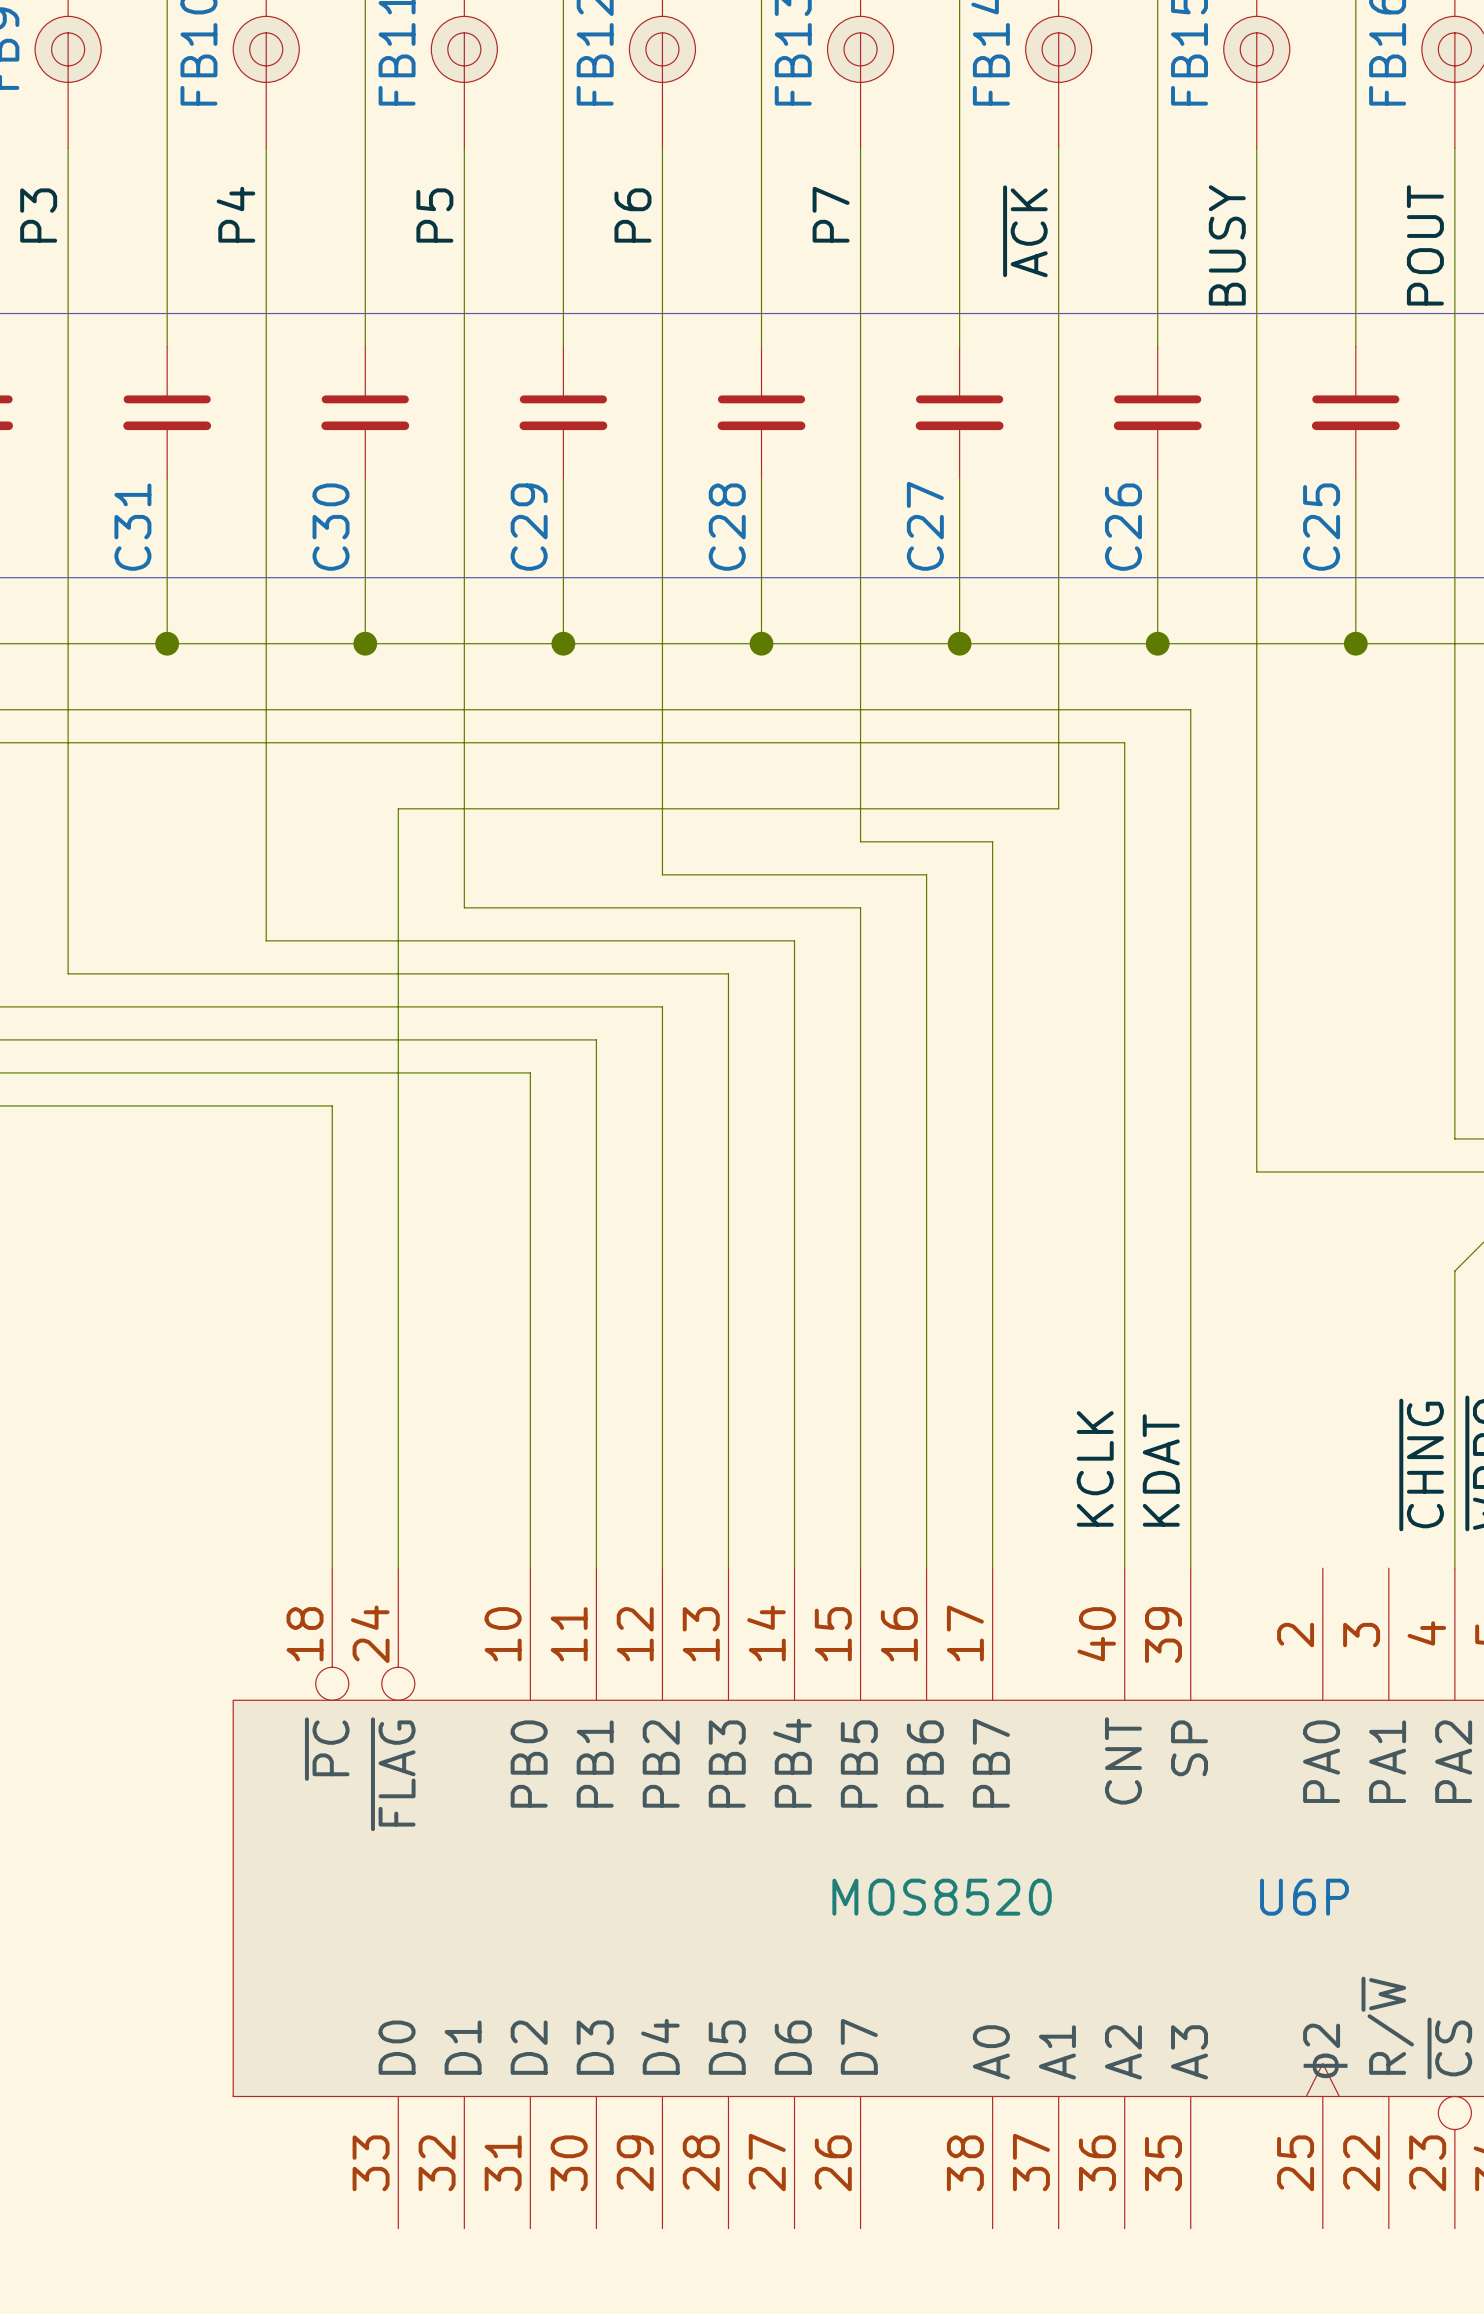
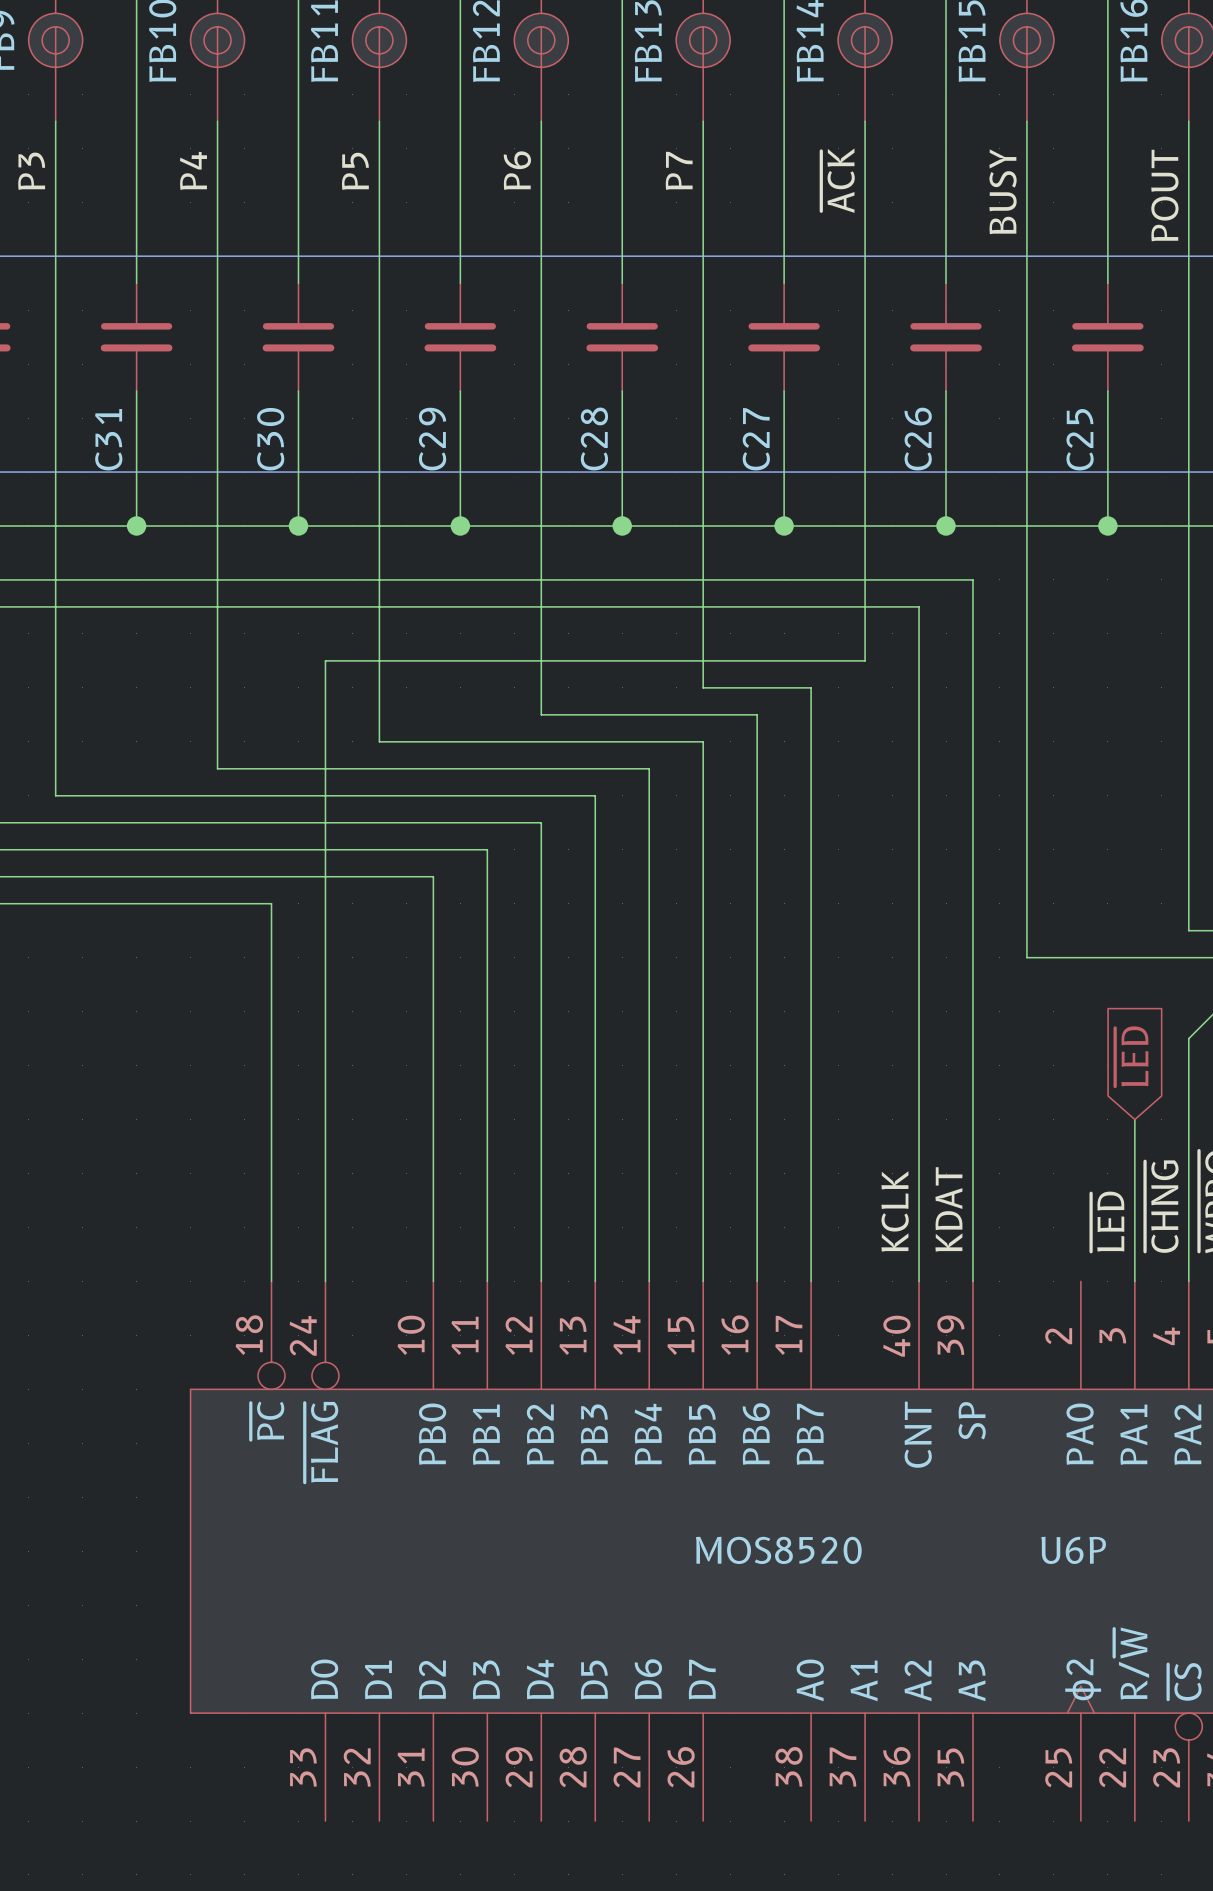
global label: none -> ~{LED} (1131, 1056)
wire: none -> (1134, 1119) (1134, 1281)
label: none -> ~{LED} (1107, 1221)

